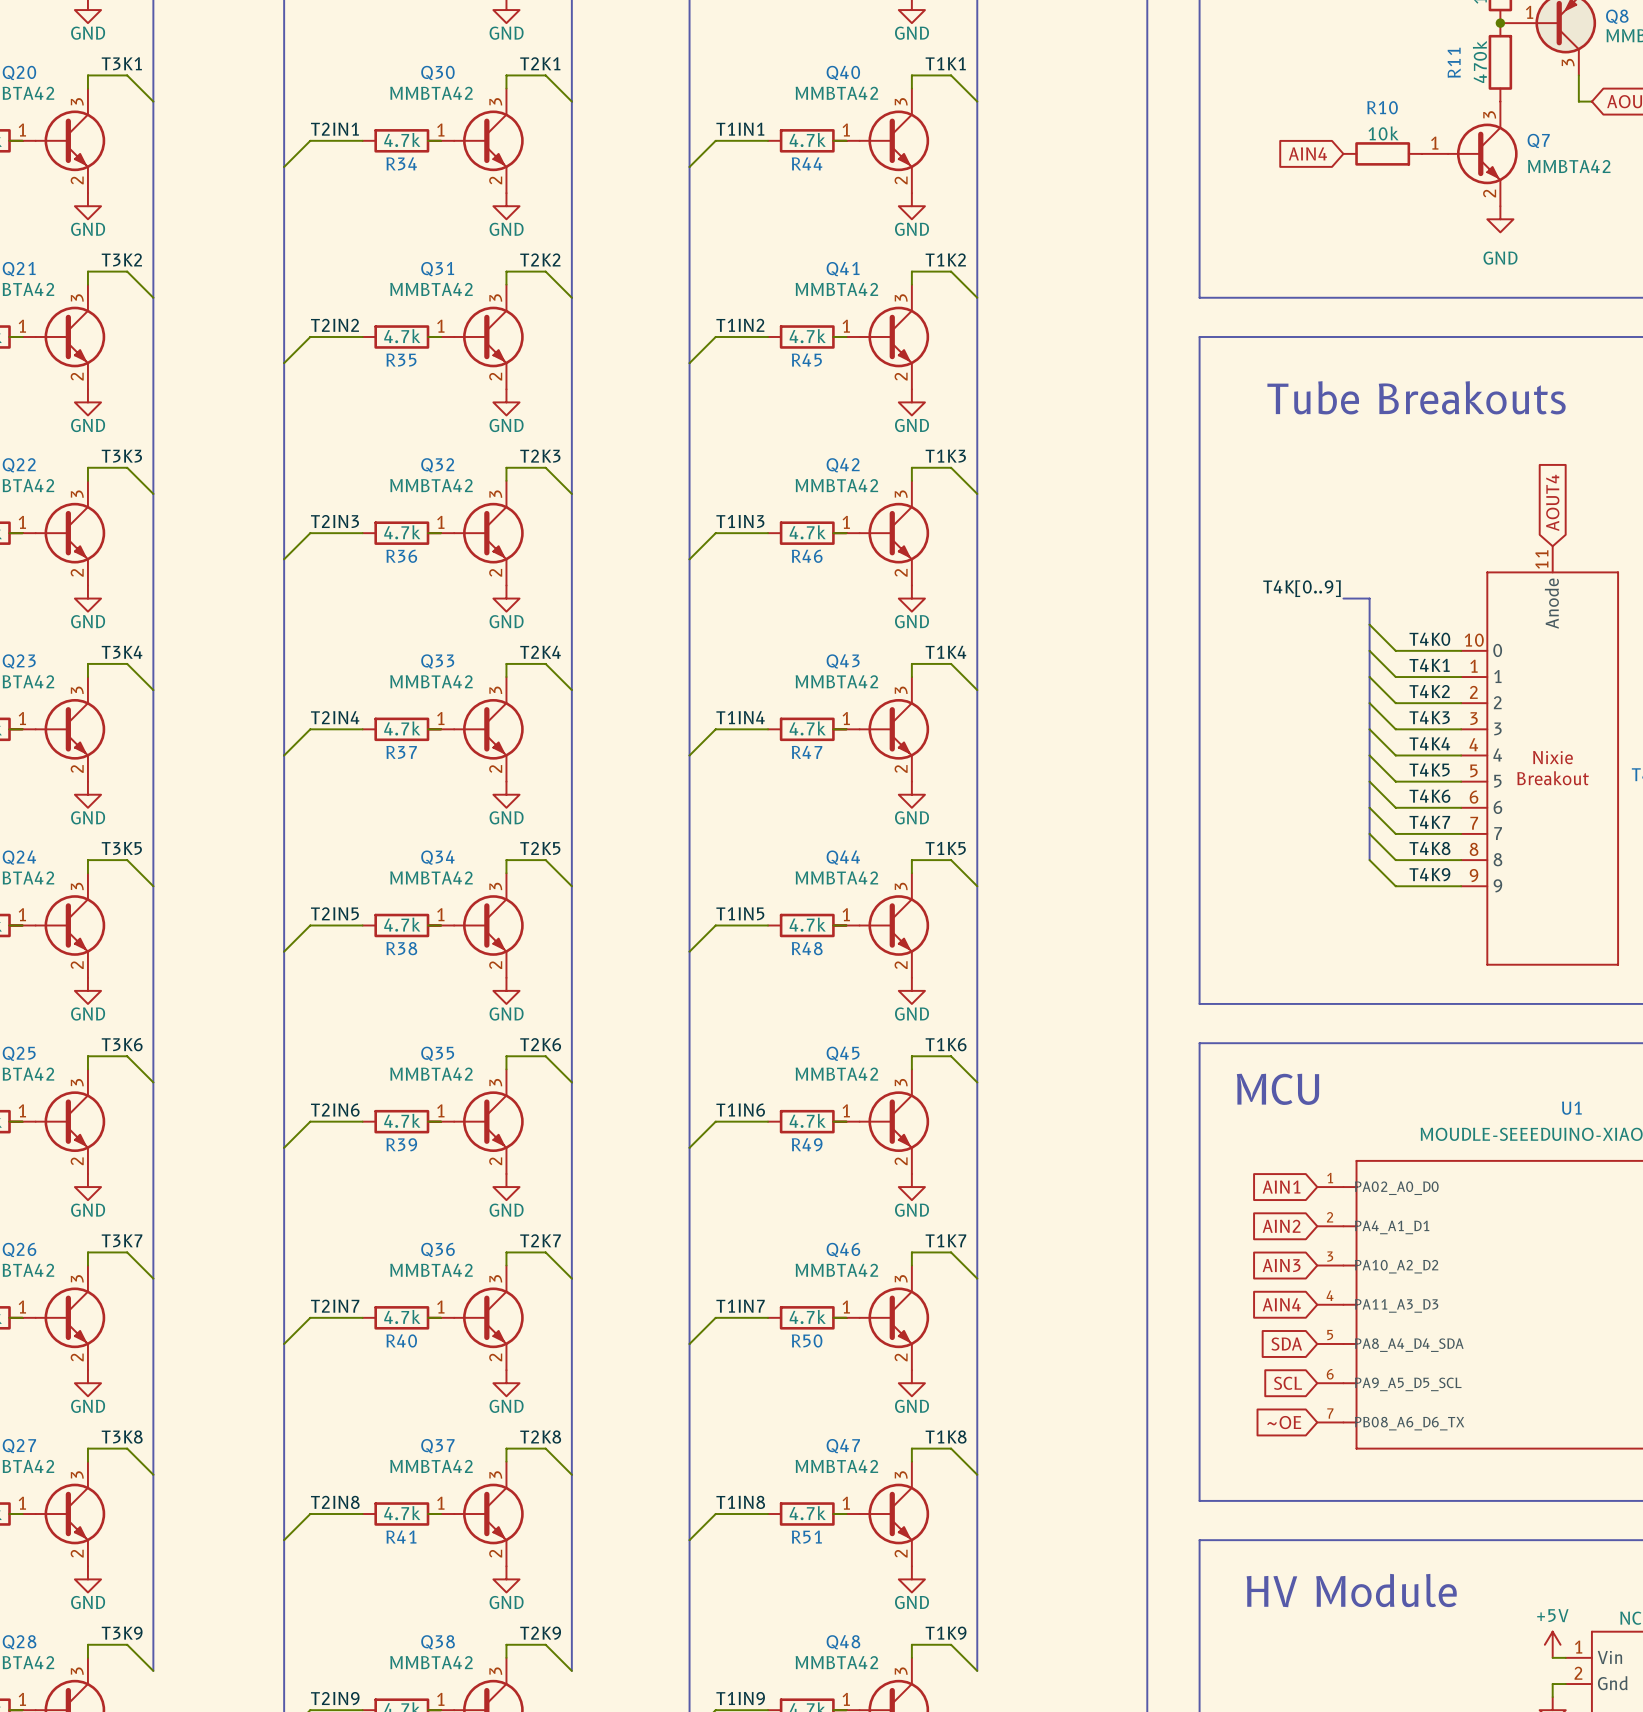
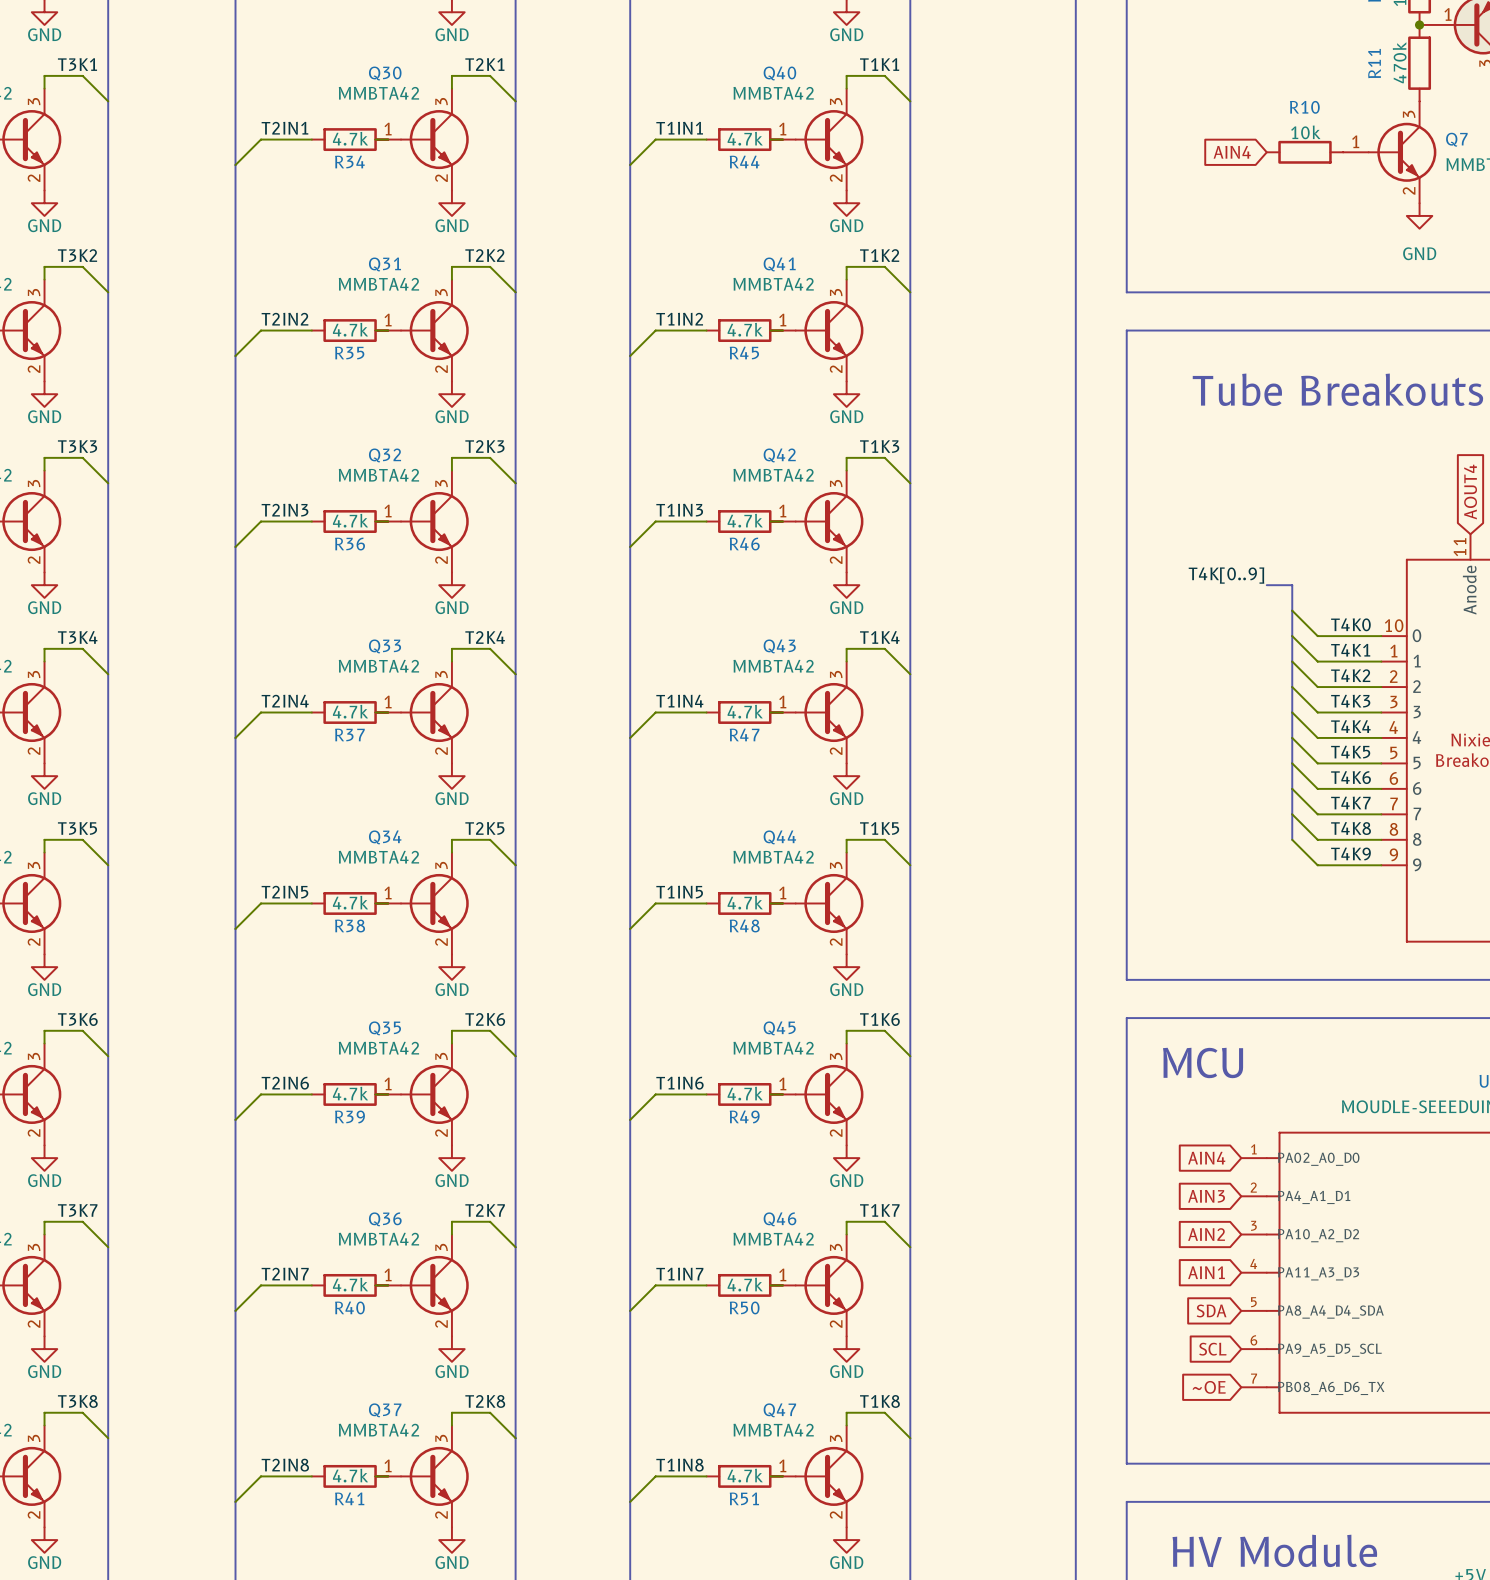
global label: AIN1 (1281, 1187) -> AIN4 (1206, 1158)
global label: AIN2 (1281, 1226) -> AIN3 (1206, 1196)
global label: AIN3 (1281, 1265) -> AIN2 (1206, 1234)
global label: AIN4 (1281, 1304) -> AIN1 (1206, 1272)

